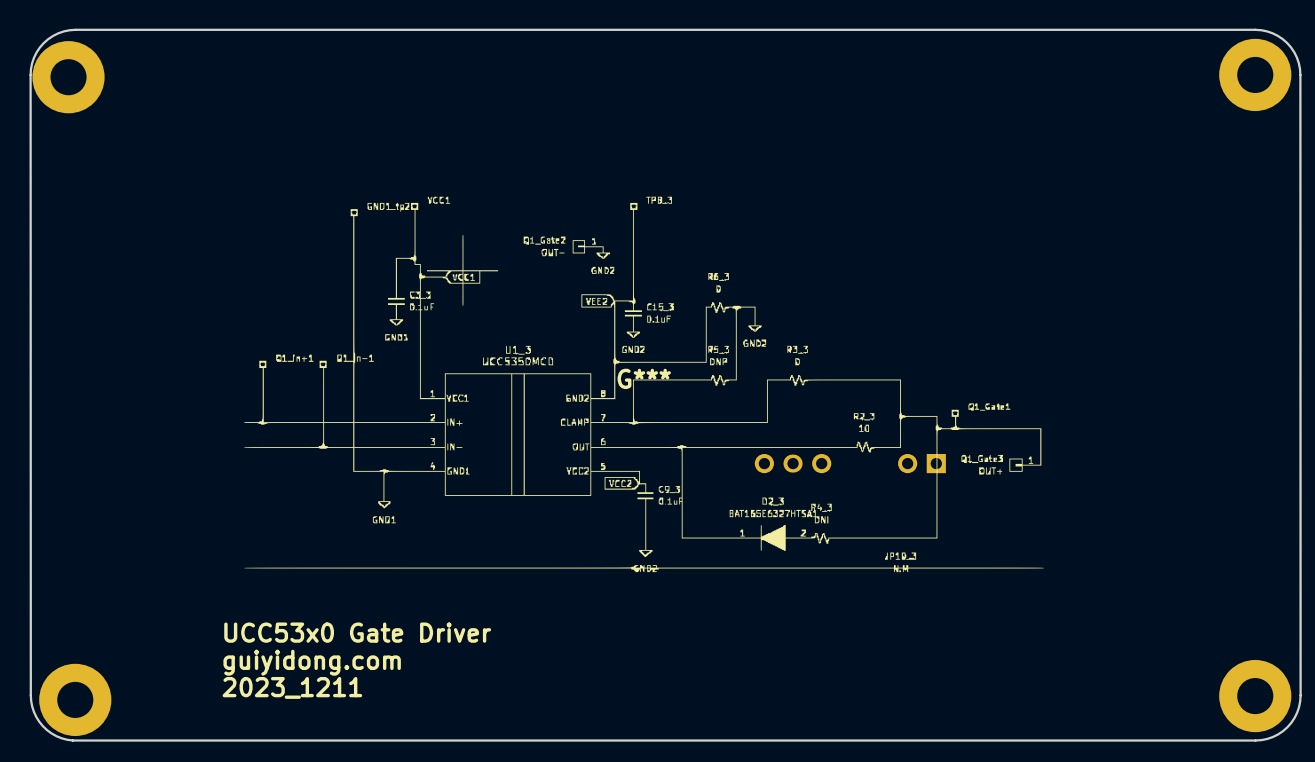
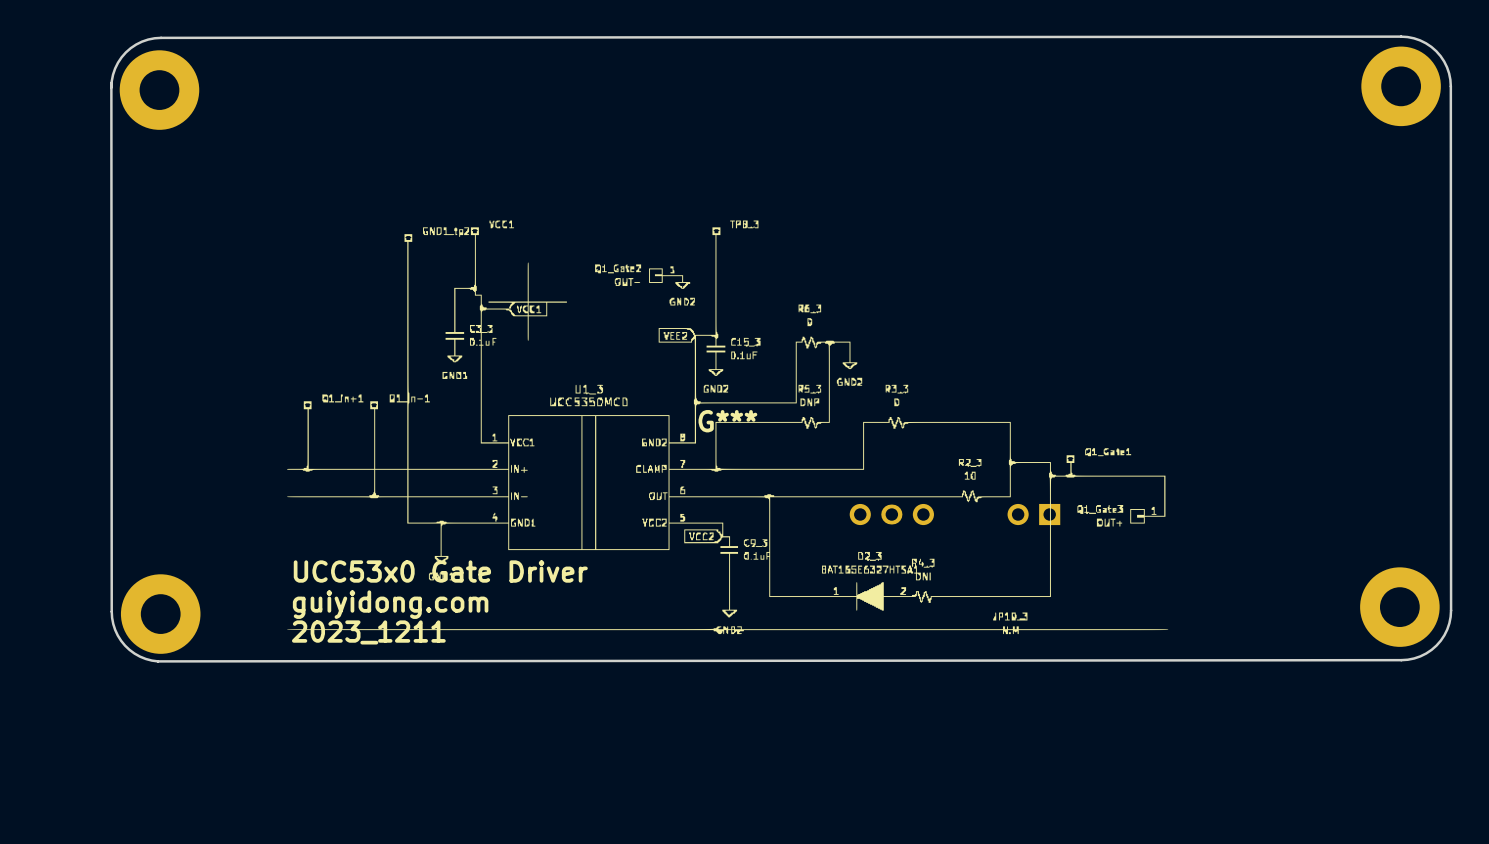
board edge: (1255, 29) (75, 29) (64, 31) (53, 35) (43, 43) (36, 52) (32, 63) (30, 74) (31, 701) (36, 717) (42, 726) (56, 736) (72, 740) (1261, 740) (1272, 737) (1282, 731) (1294, 717) (1299, 707) (1300, 550) -> (111, 82) (111, 611) (113, 624) (121, 640) (134, 653) (145, 658) (157, 661) (1401, 660) (1420, 656) (1436, 645) (1447, 629) (1451, 610)
board edge: none -> (1401, 36) (161, 37) (142, 41) (125, 52) (115, 68) (111, 87)
part position: (68, 77) -> (159, 90)
text position: UCC53x0 Gate Driver (357, 632) -> UCC53x0 Gate Driver (440, 571)
text position: guiyidong.com (312, 662) -> guiyidong.com (390, 604)
text position: 2023_1211 (292, 687) -> 2023_1211 (368, 632)
part position: (1255, 696) -> (1399, 607)
part position: (75, 699) -> (160, 614)

